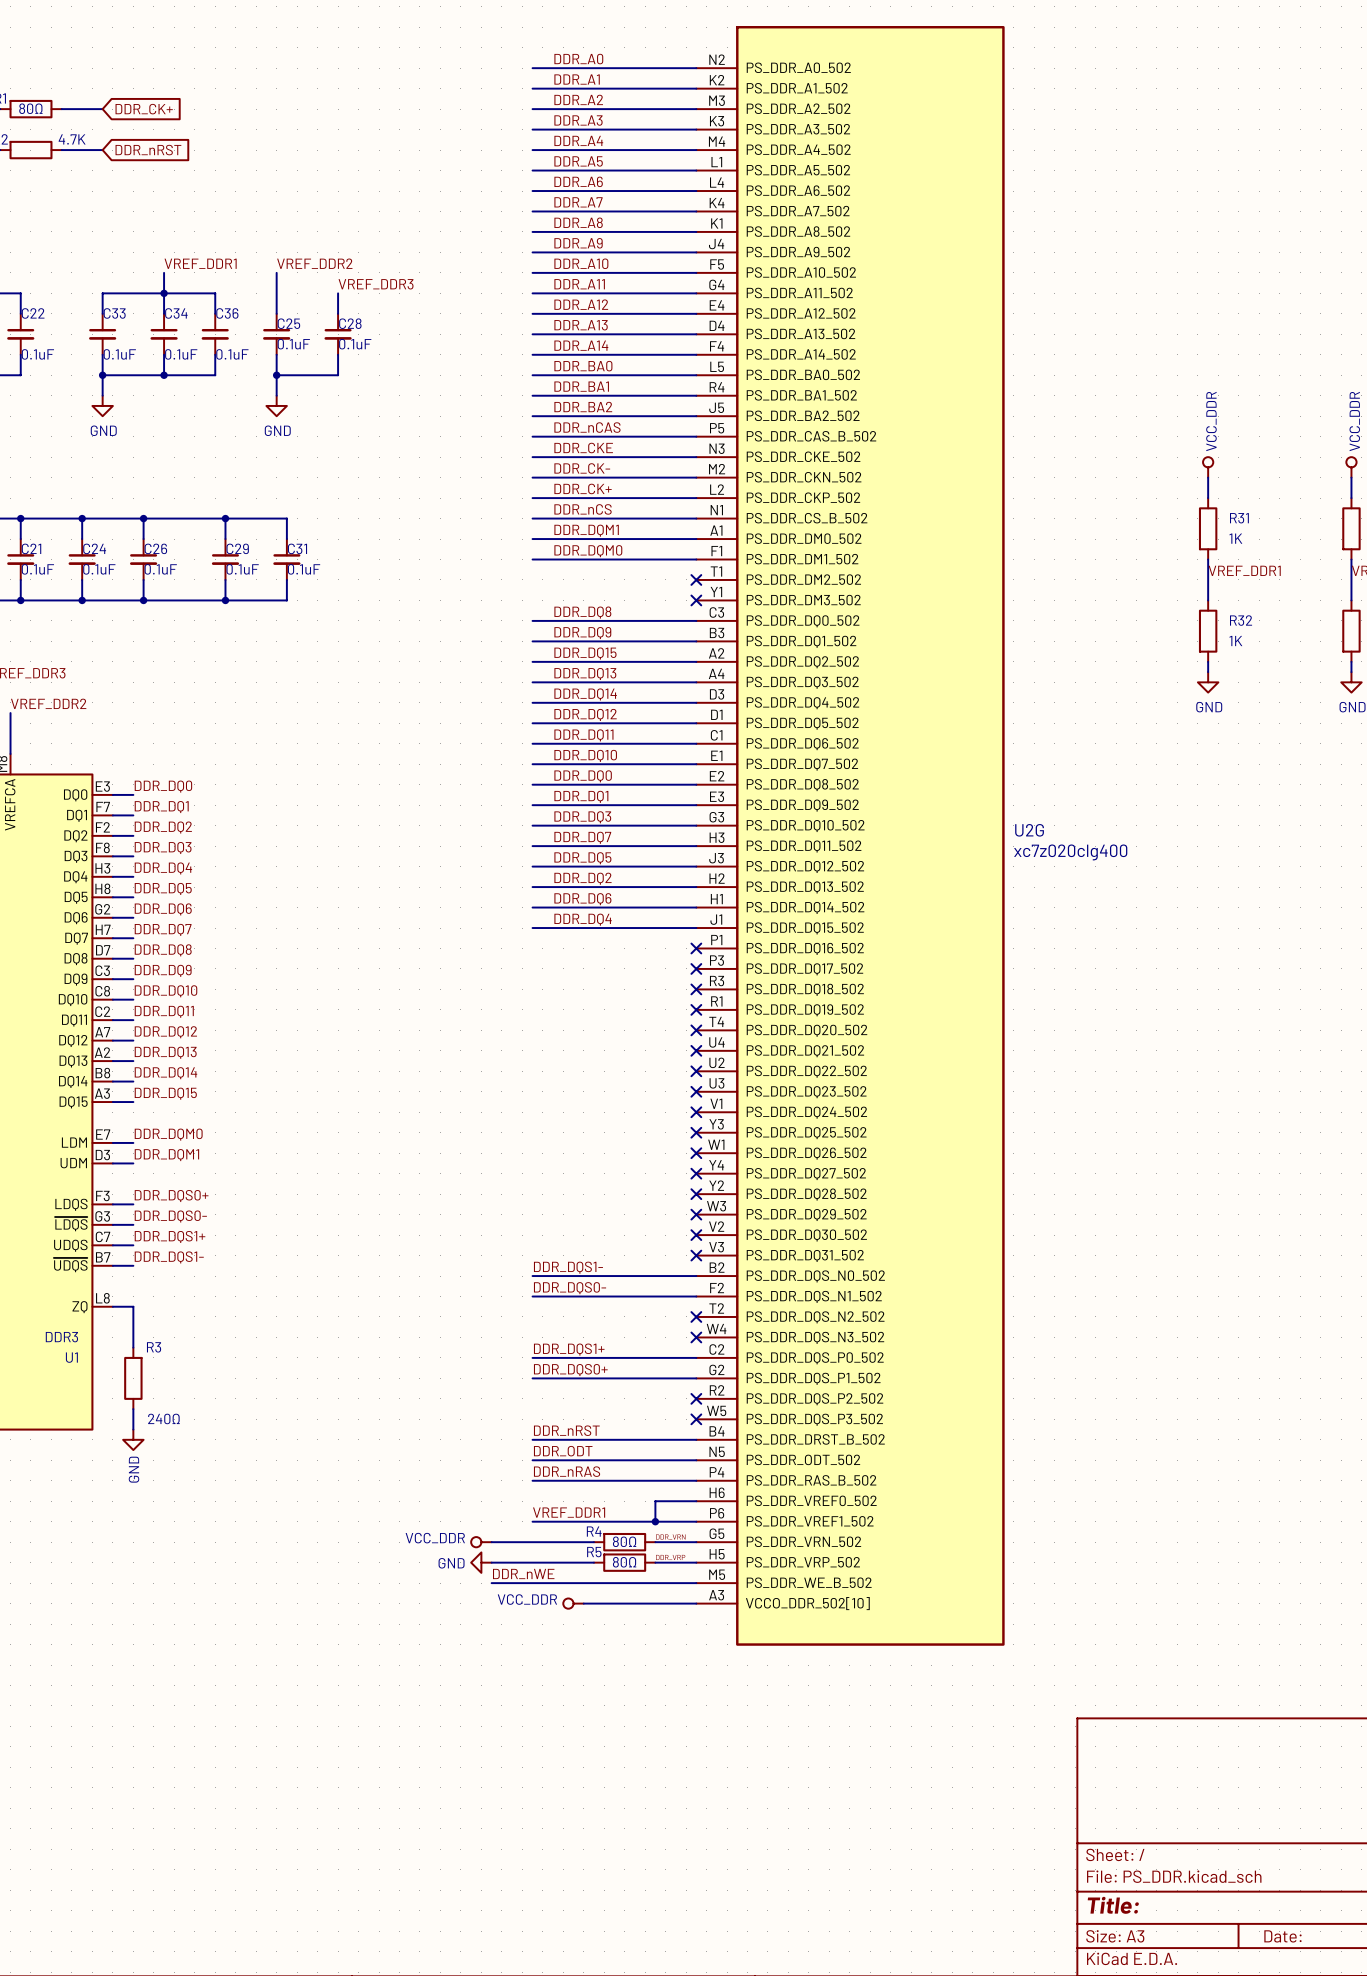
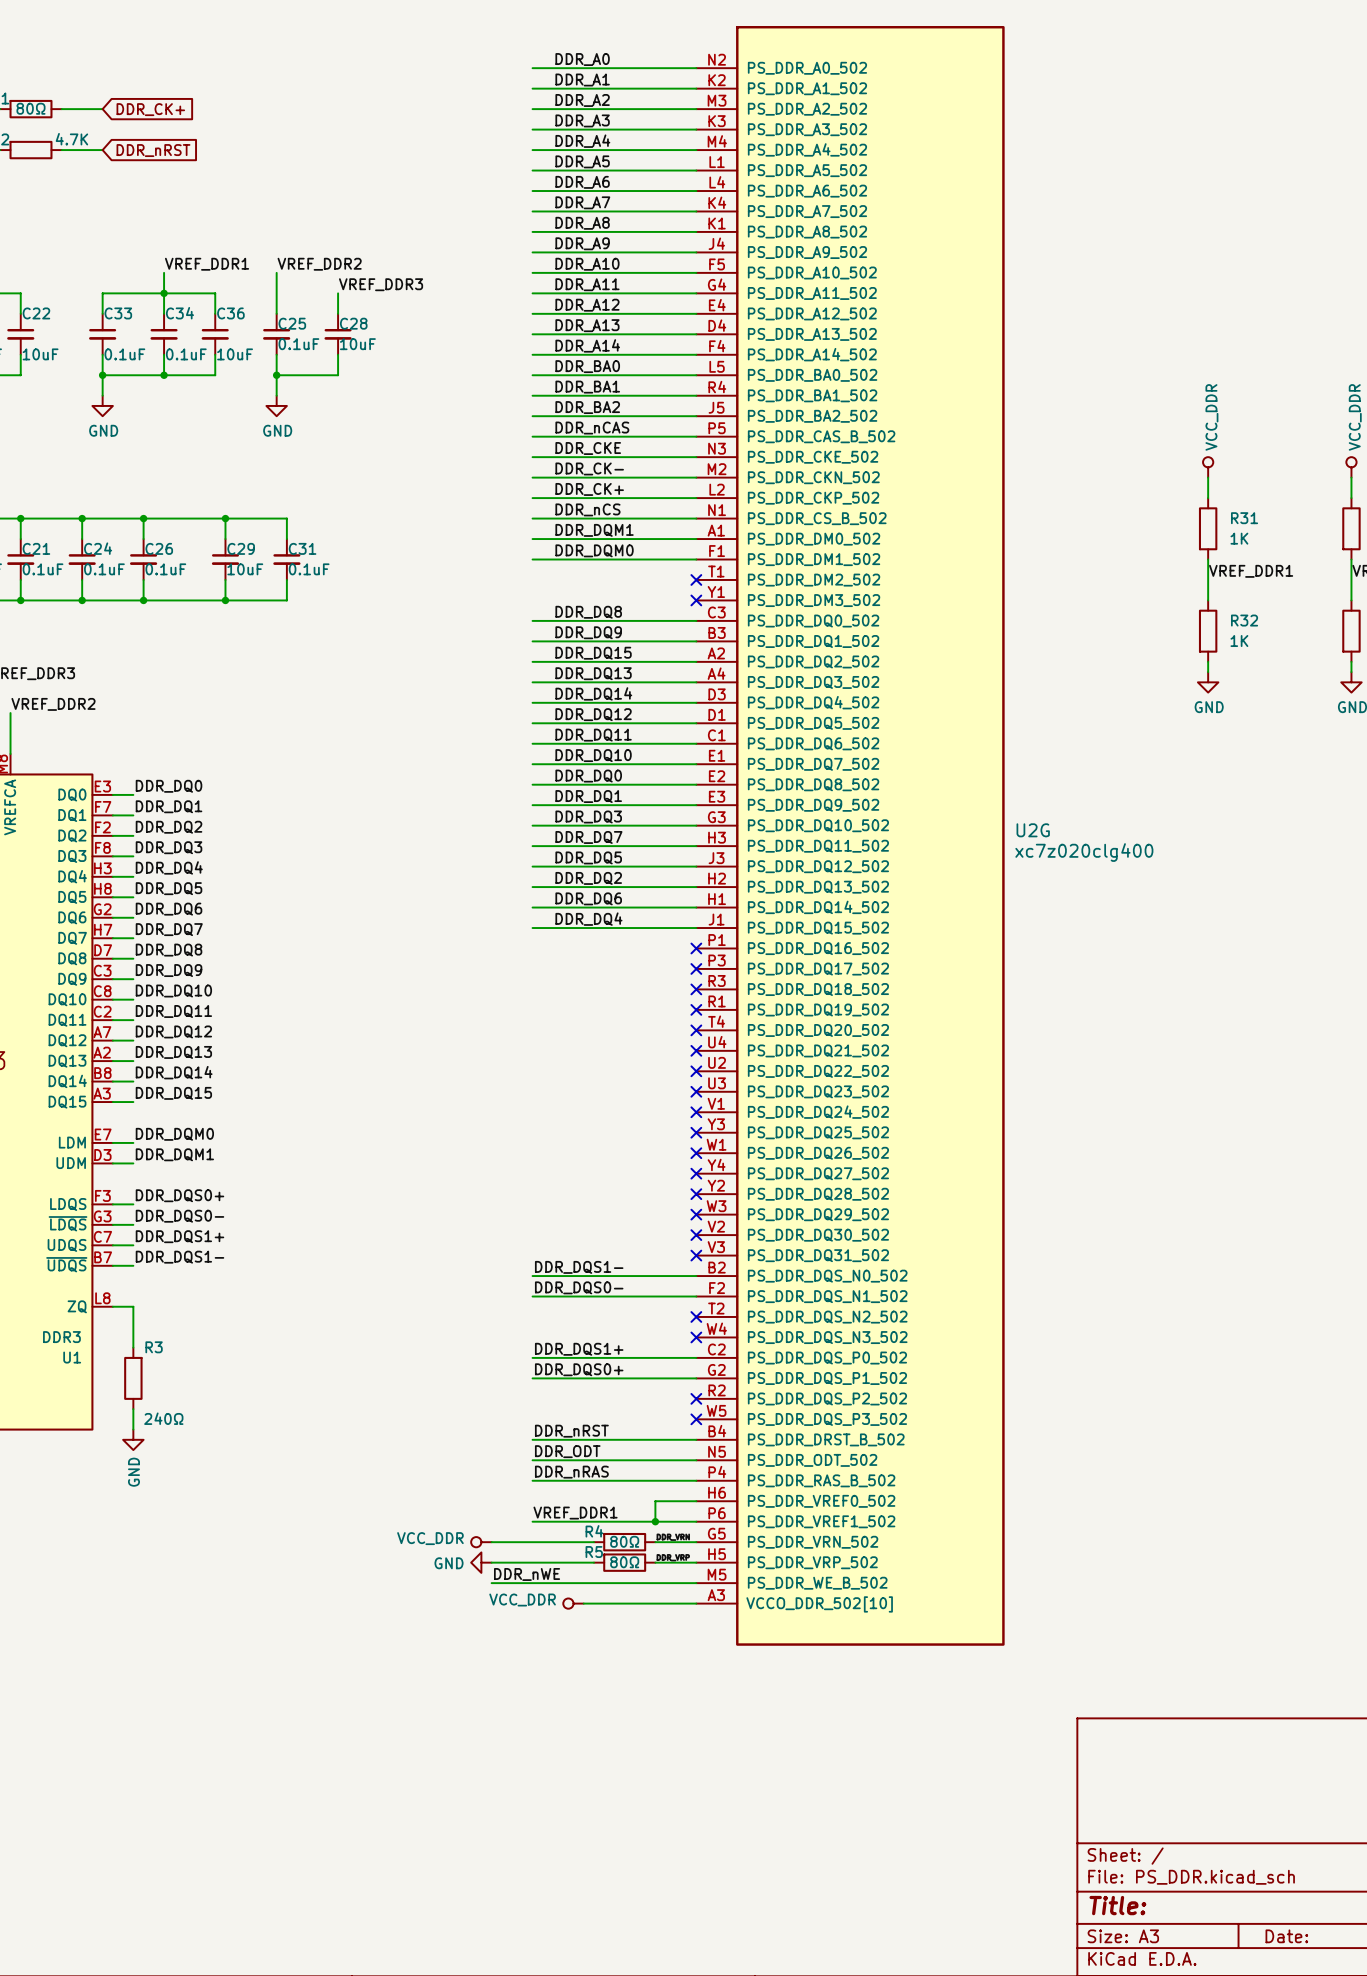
C28 value: 0.1uF (355, 344) -> 10uF (357, 344)
C22 value: 0.1uF (37, 354) -> 10uF (40, 354)
C36 value: 0.1uF (232, 354) -> 10uF (235, 354)
C29 value: 0.1uF (242, 569) -> 10uF (245, 569)

